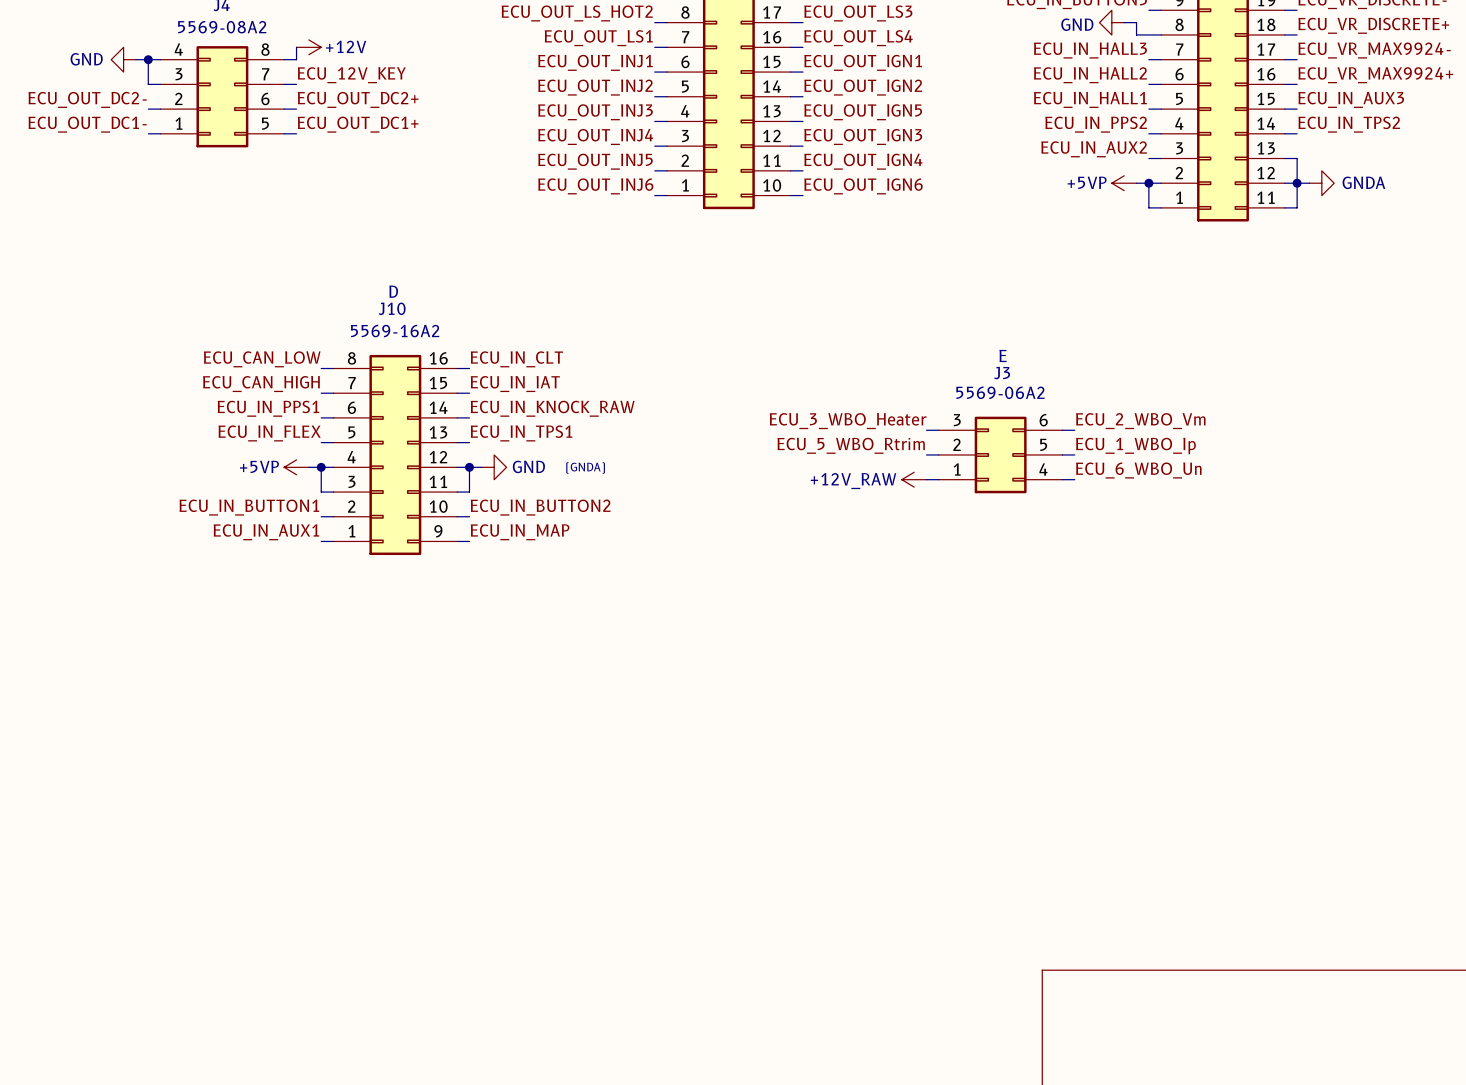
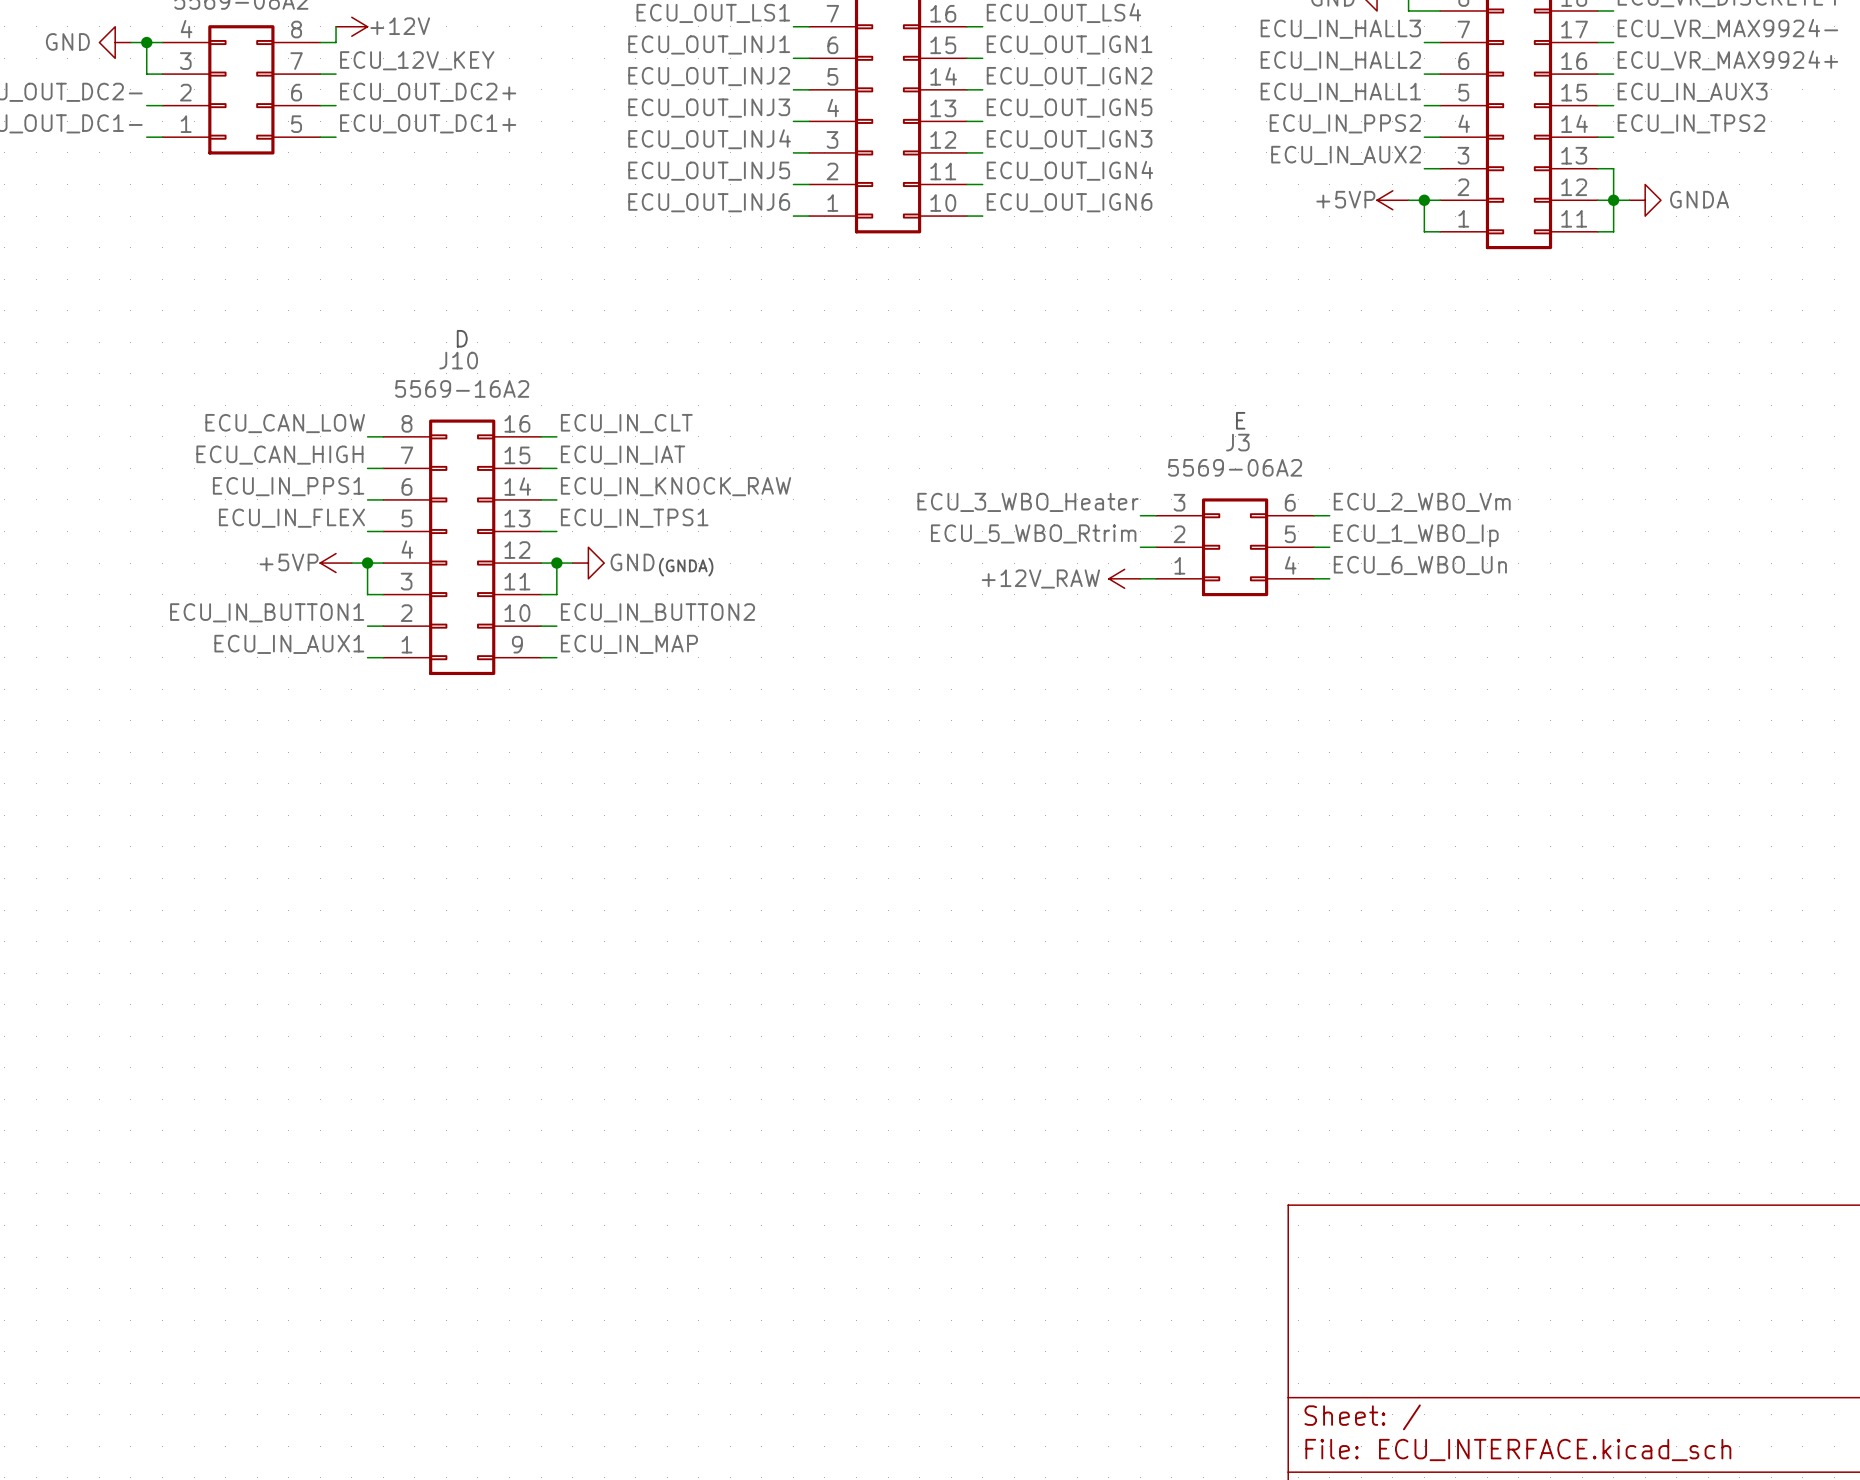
text position: (GNDA) (585, 468) -> (GNDA) (686, 567)

